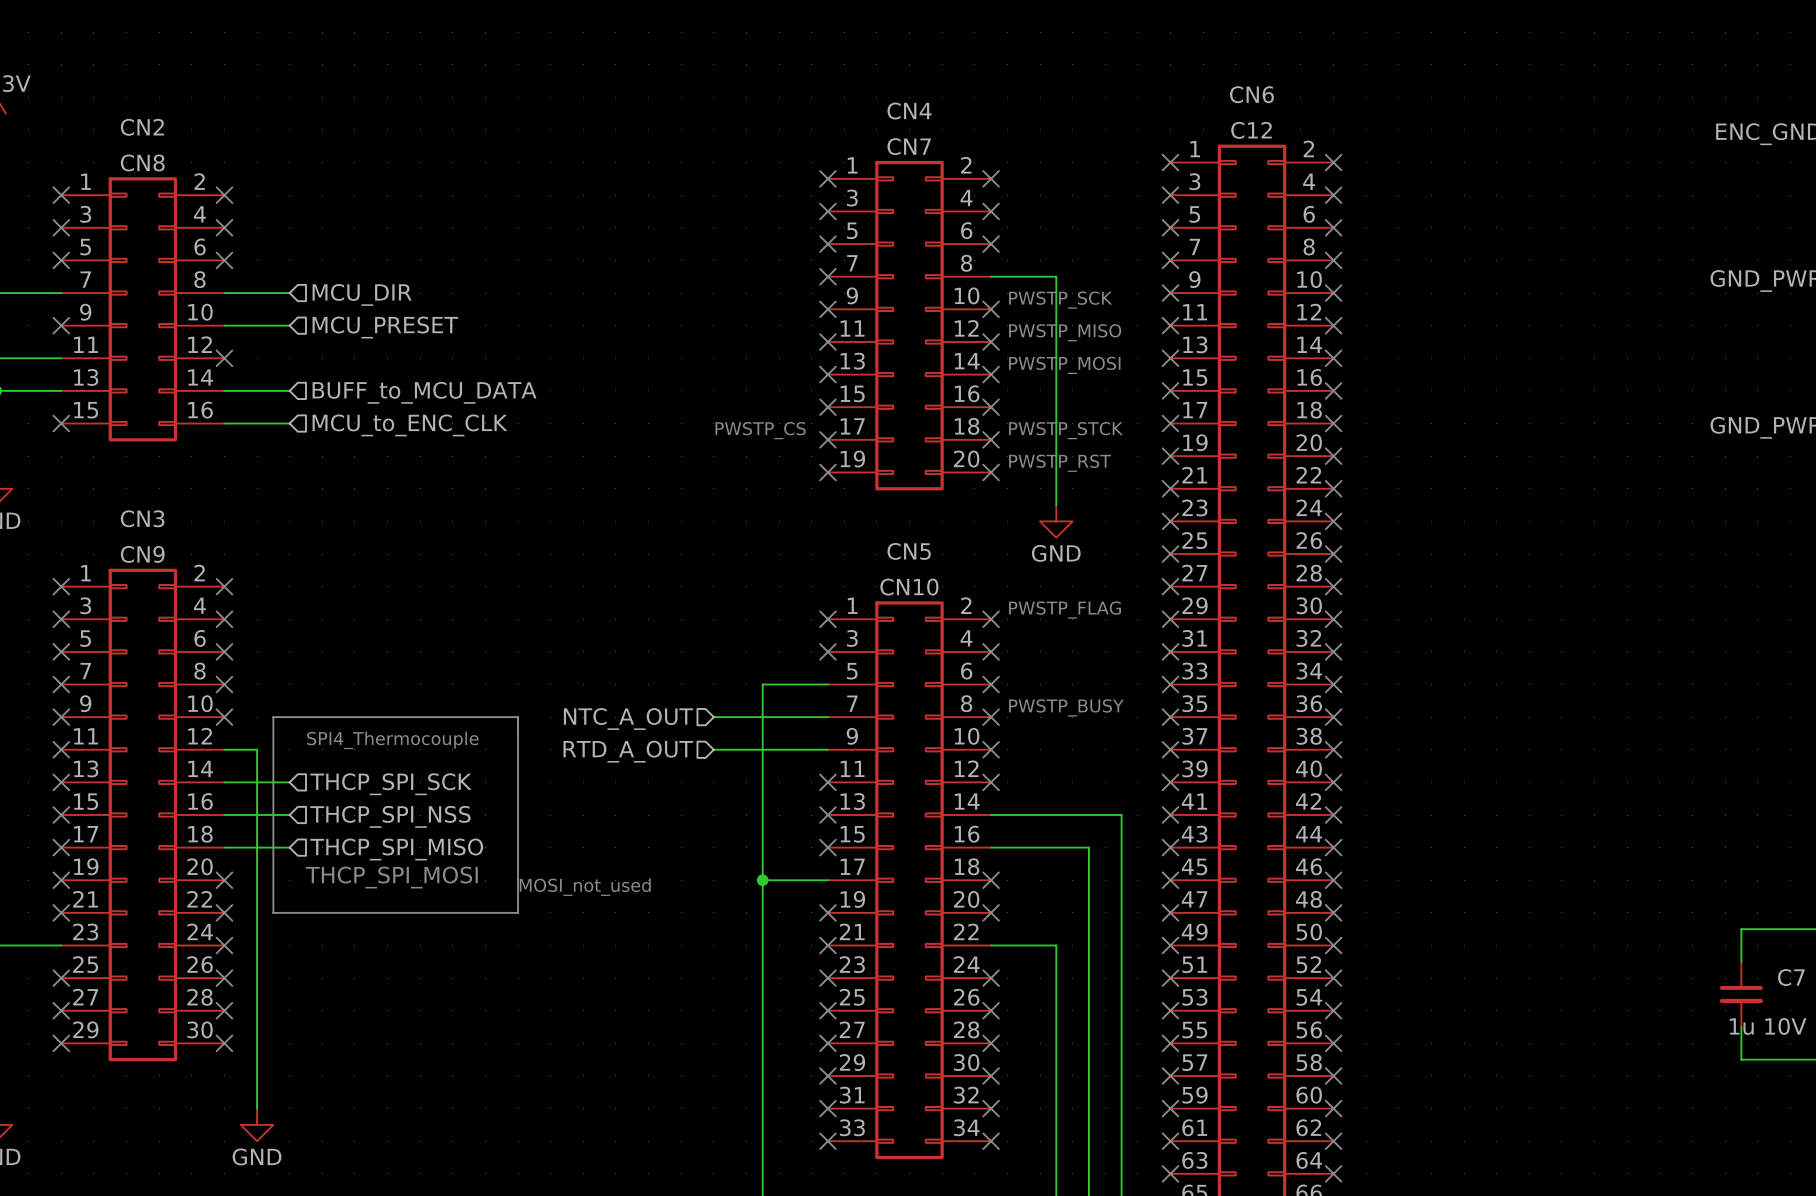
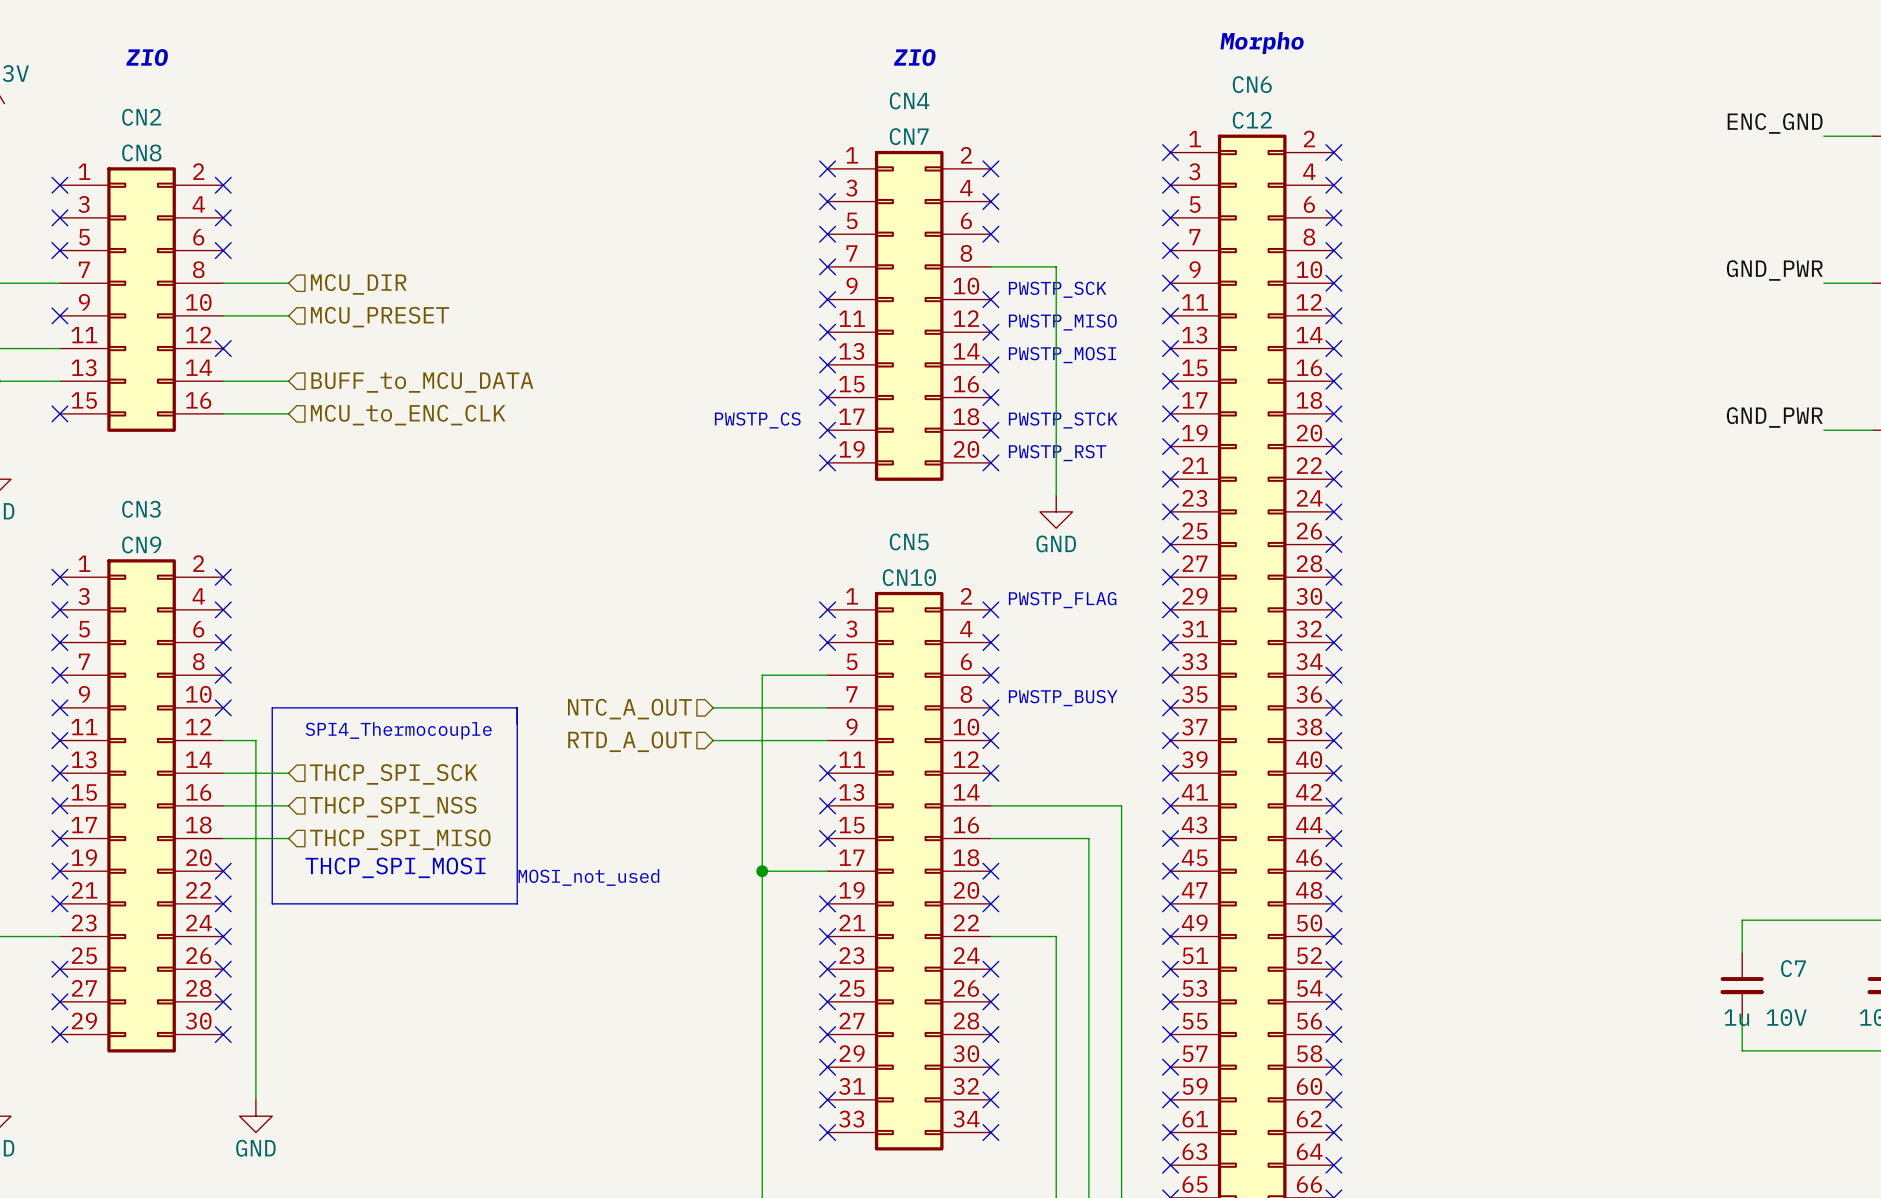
text: none -> Morpho (1262, 43)
text: none -> ZIO (147, 57)
text: none -> ZIO (914, 57)

